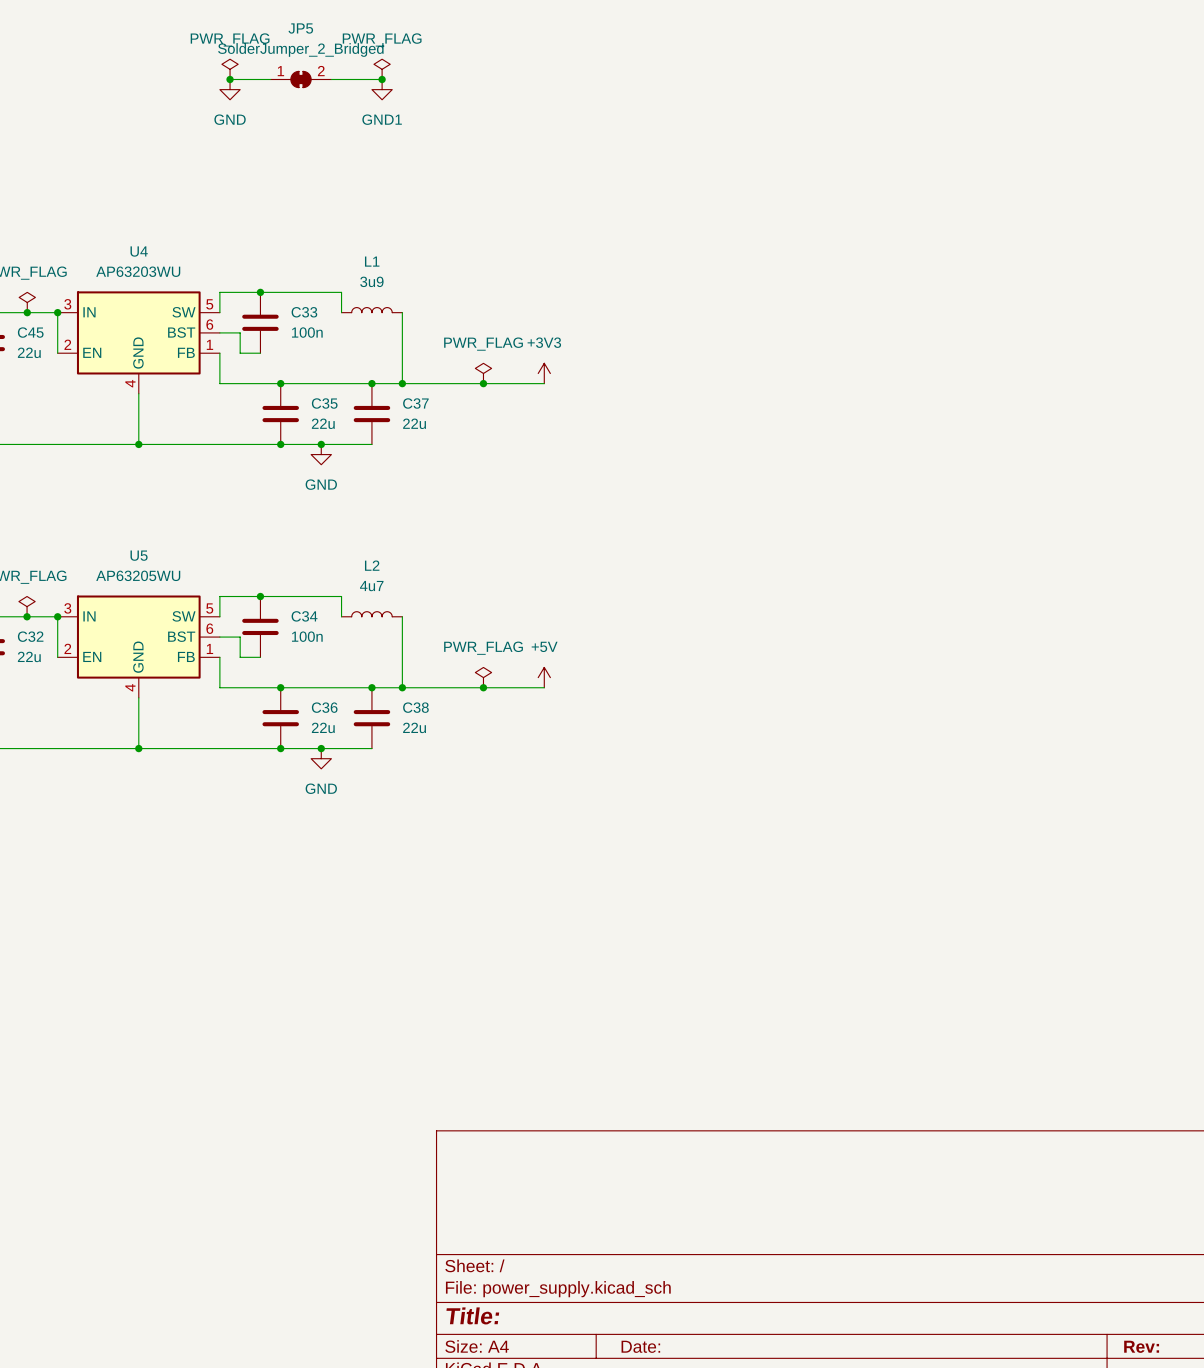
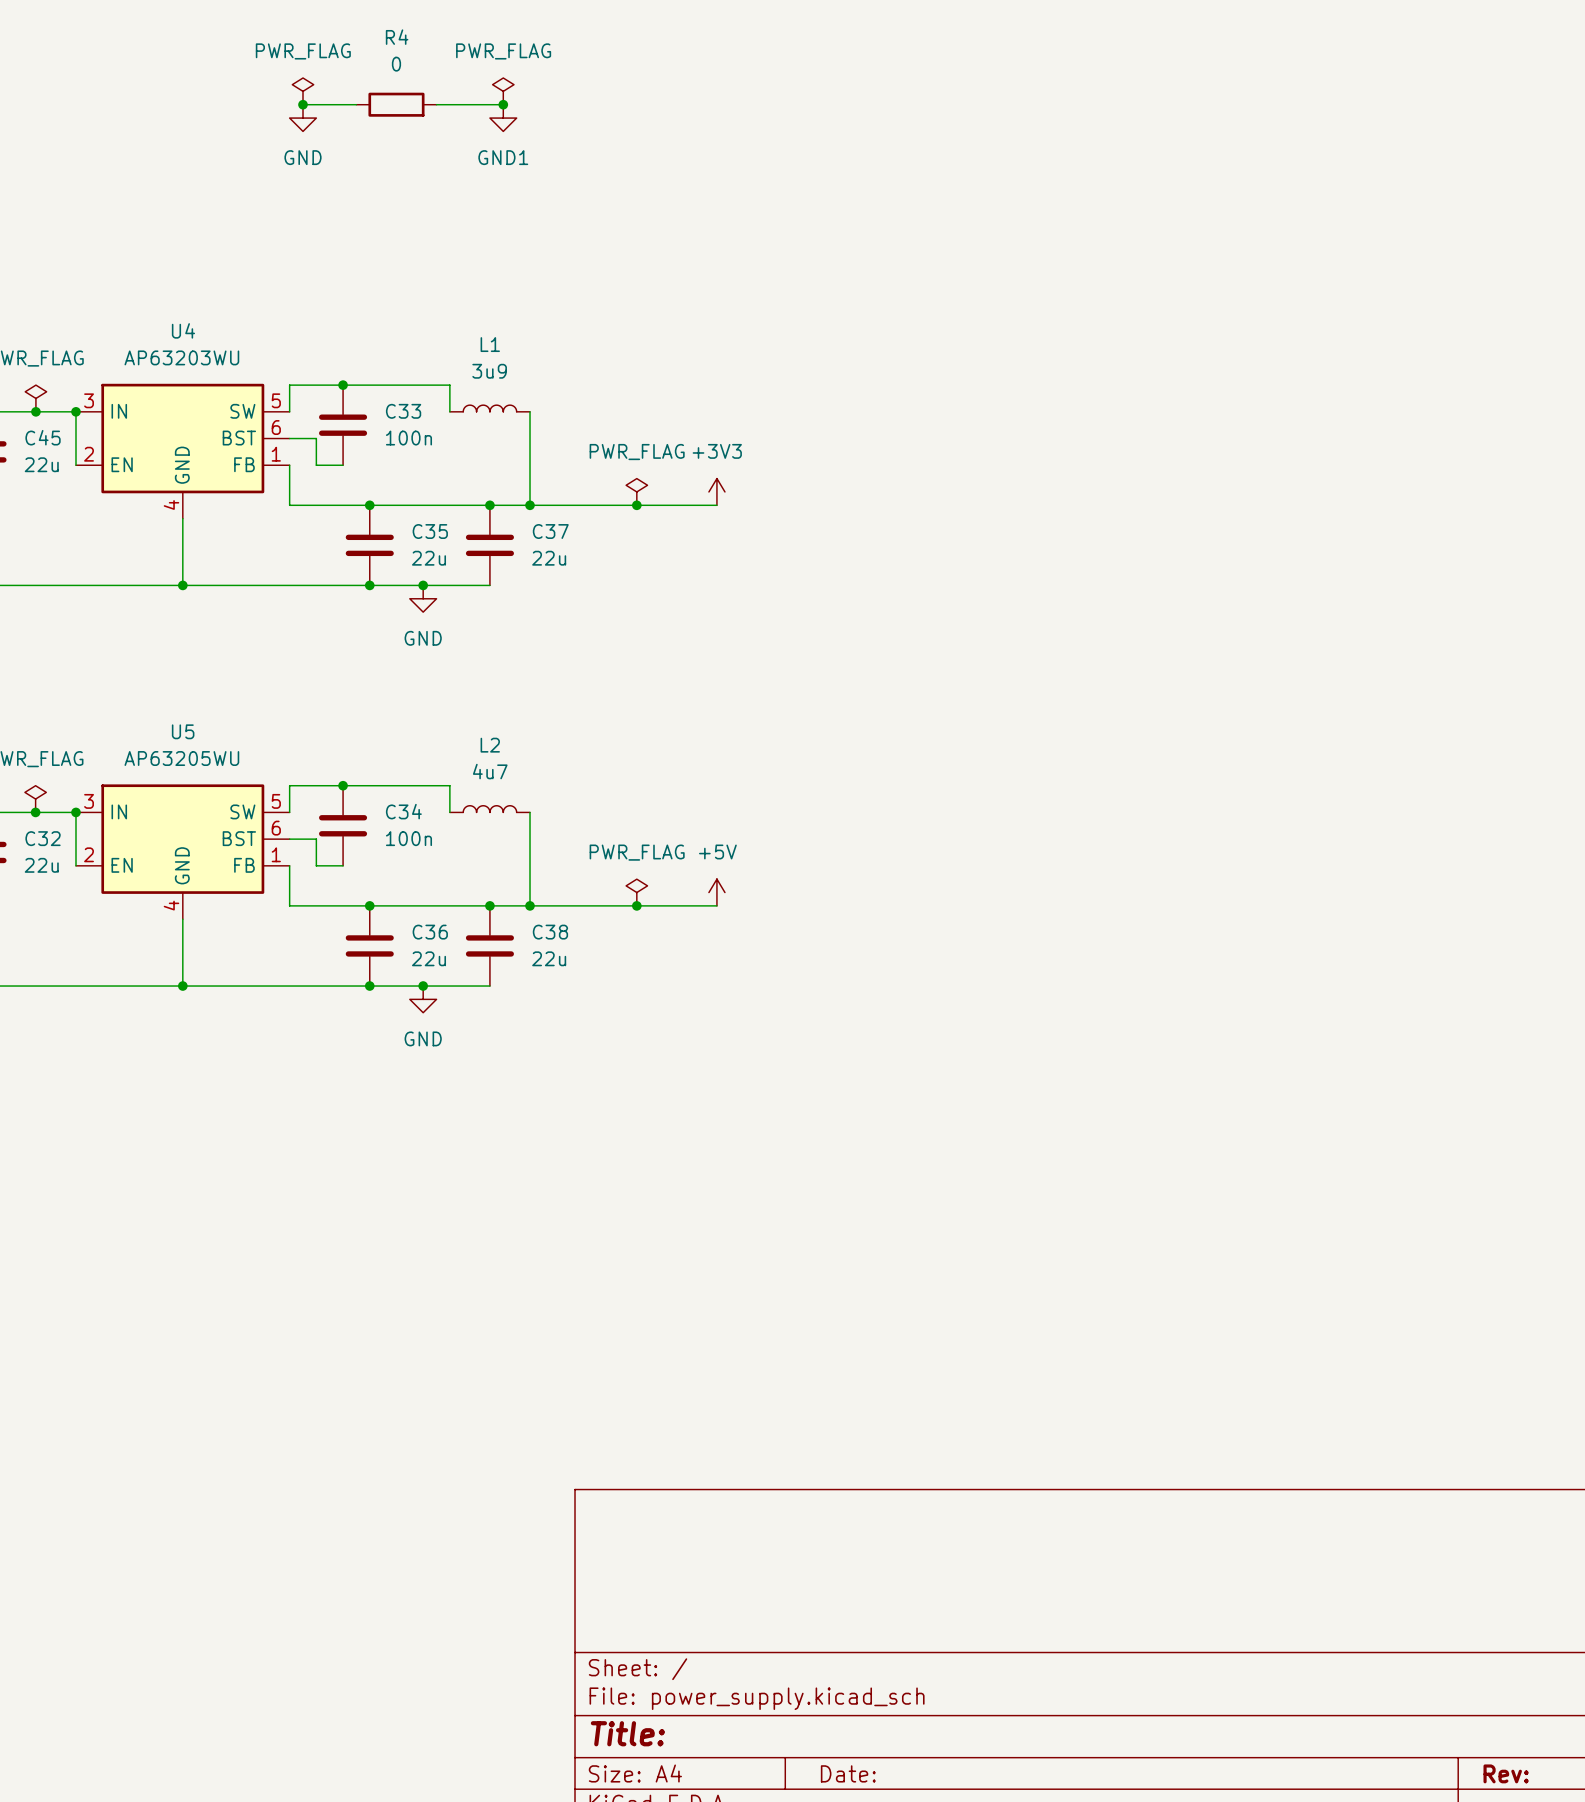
JP5: SolderJumper_2_Bridged (300, 79) -> none
R4: none -> 0 (396, 104)

